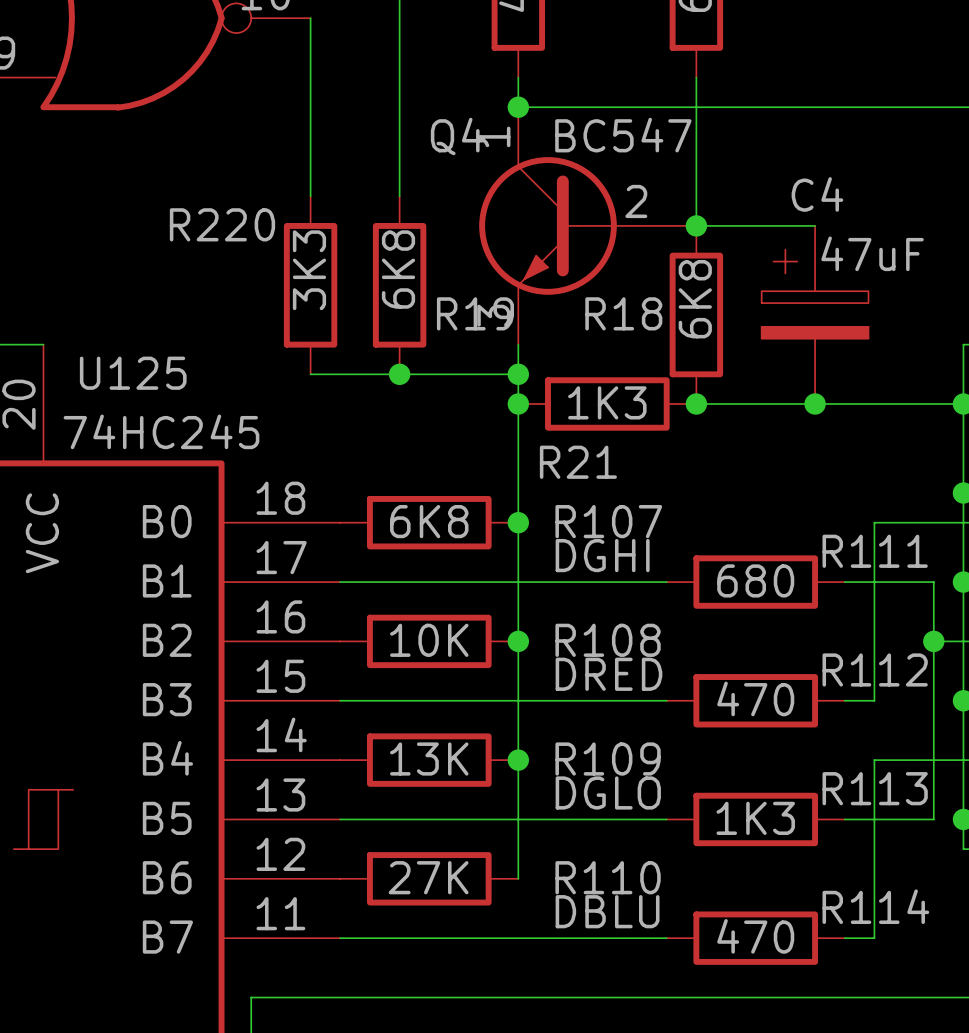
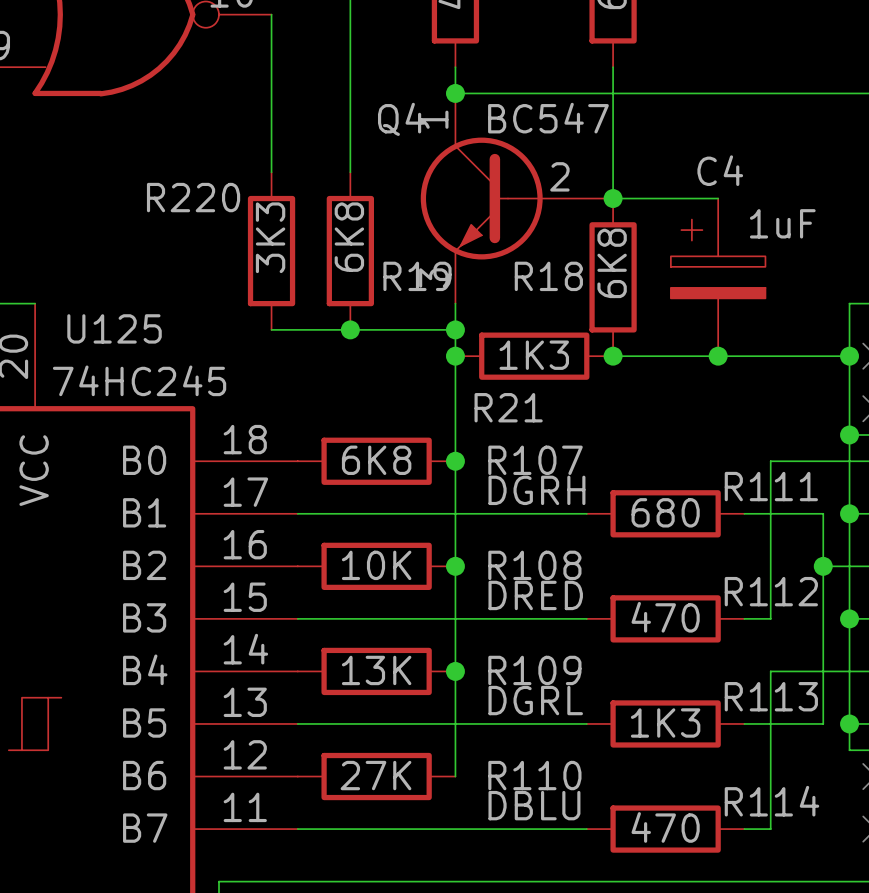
C4 value: 47uF (872, 253) -> 1uF (782, 223)
label: DGHI (602, 555) -> DGRH (536, 490)
label: DGLO (608, 792) -> DGRL (535, 700)

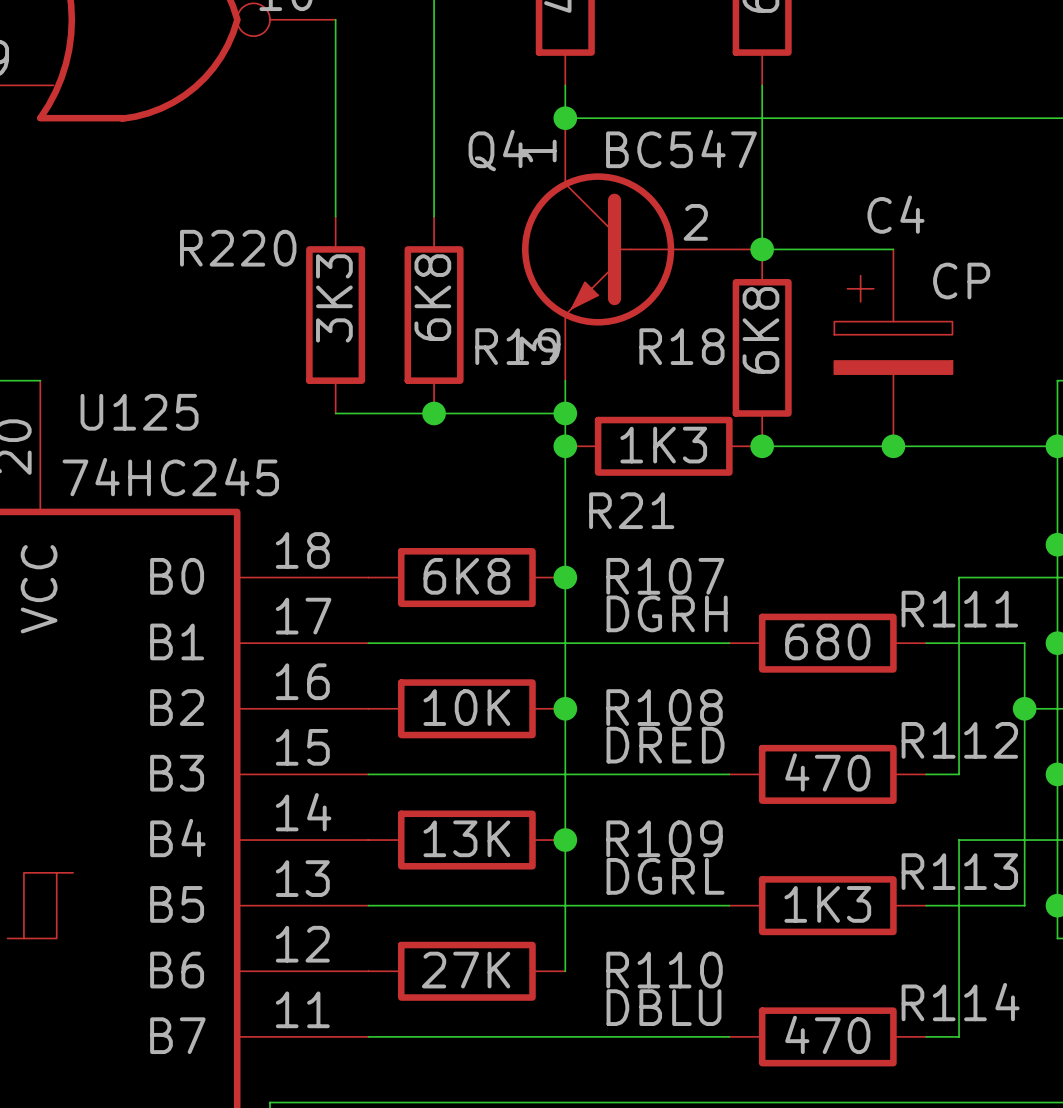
C4 value: 1uF (782, 223) -> CP (961, 281)

